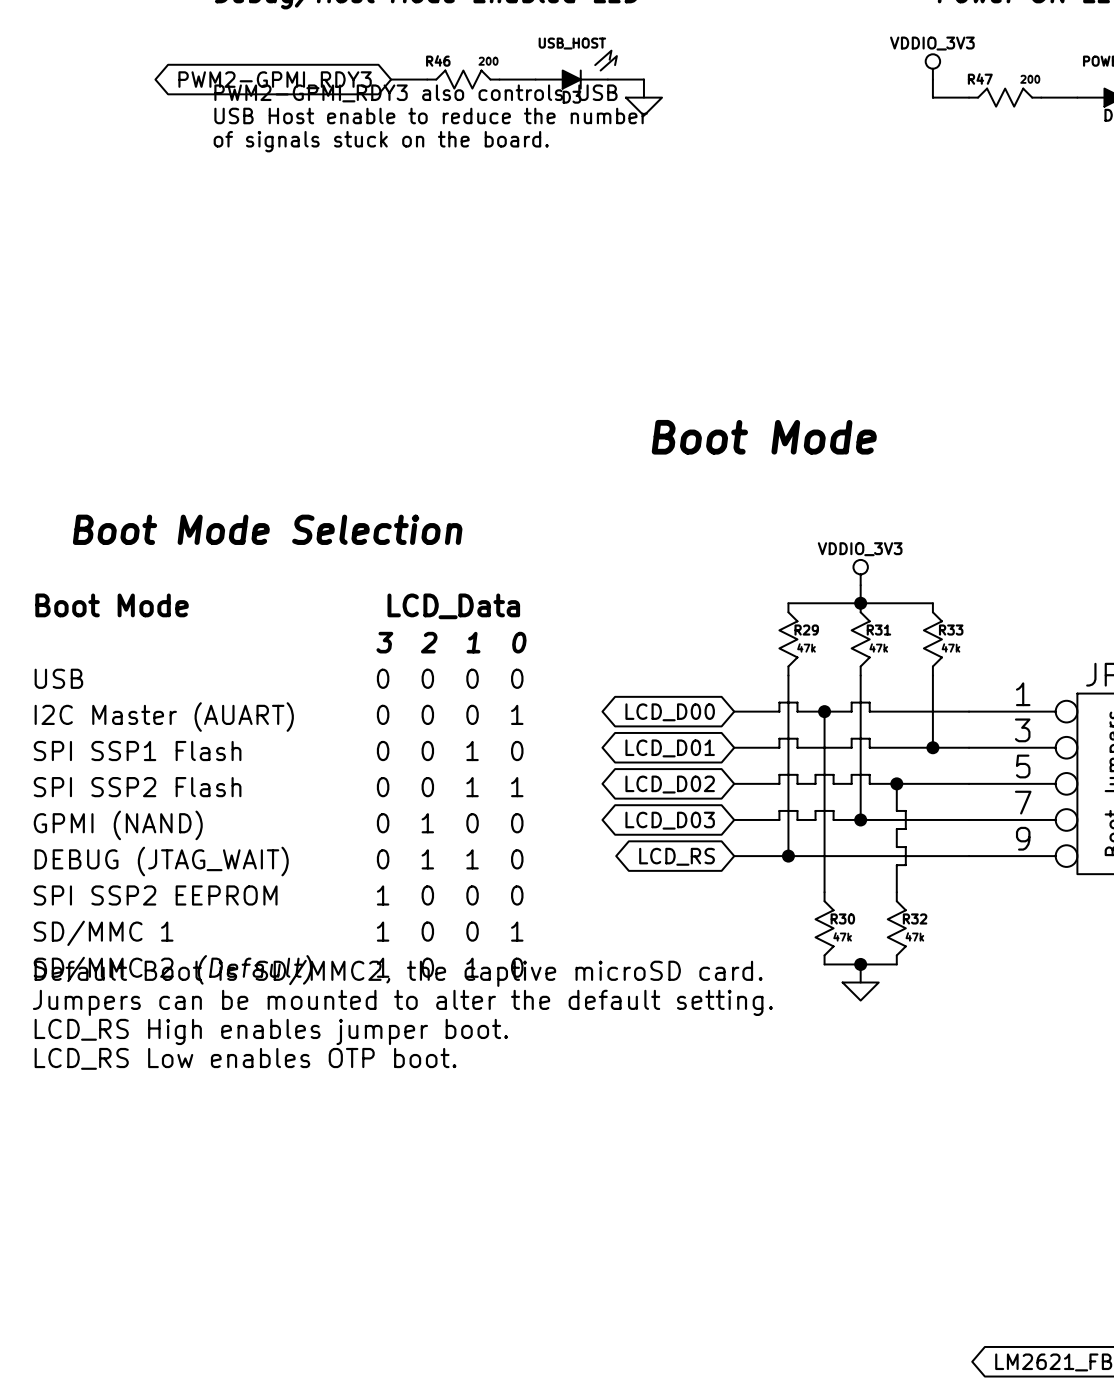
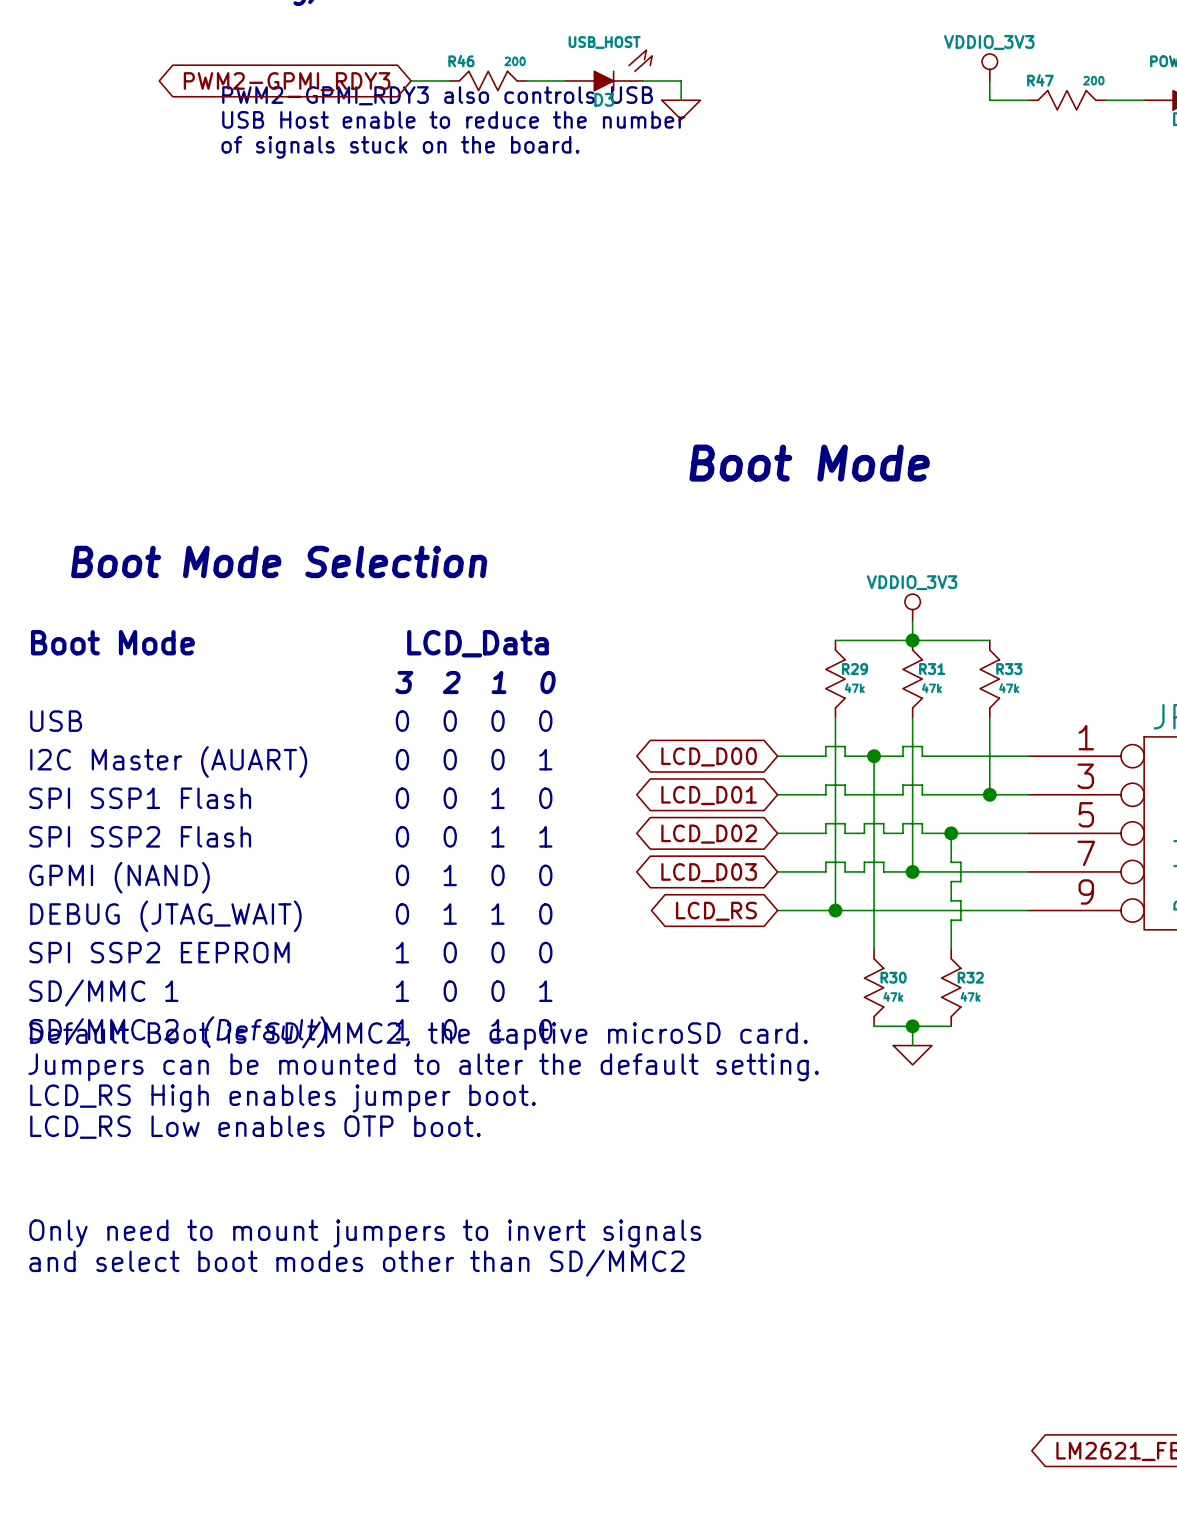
text: none -> Only need to mount jumpers to invert signals (365, 1233)
text: none -> and select boot modes other than SD/MMC2 (356, 1263)

